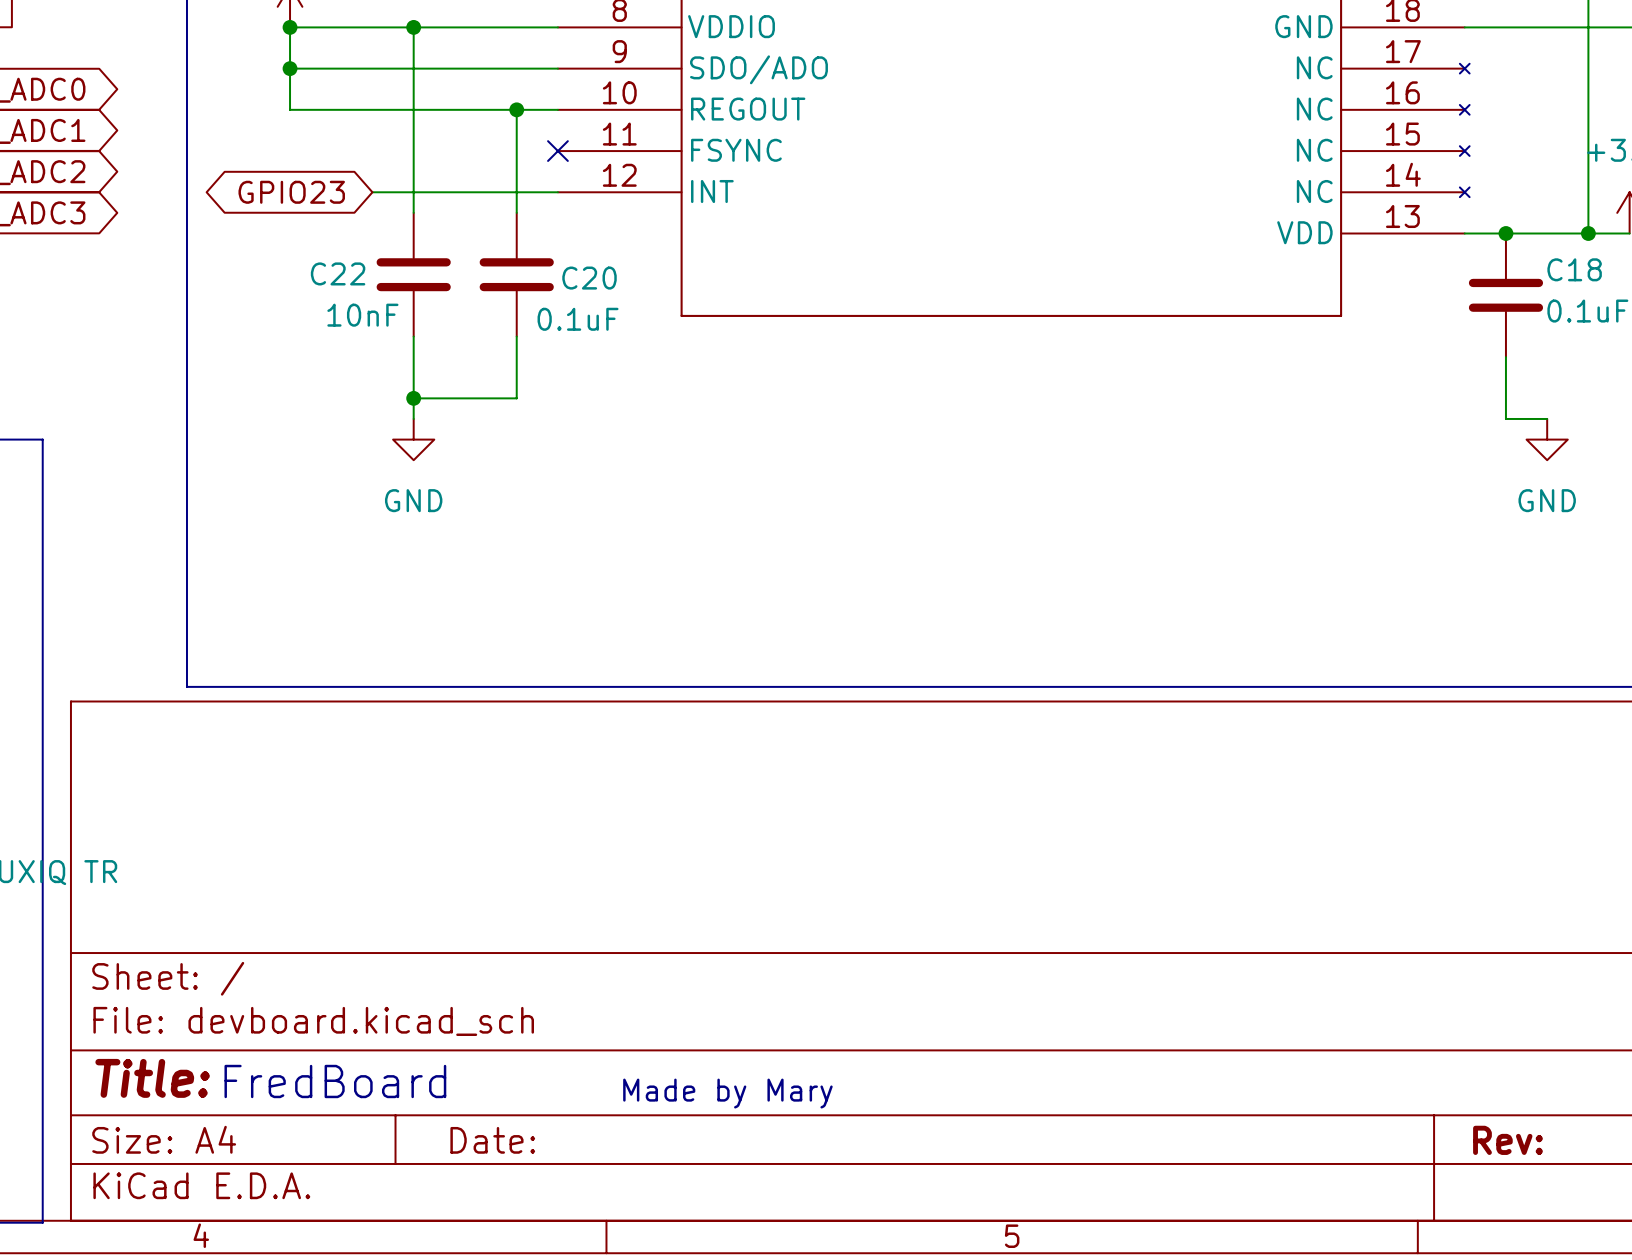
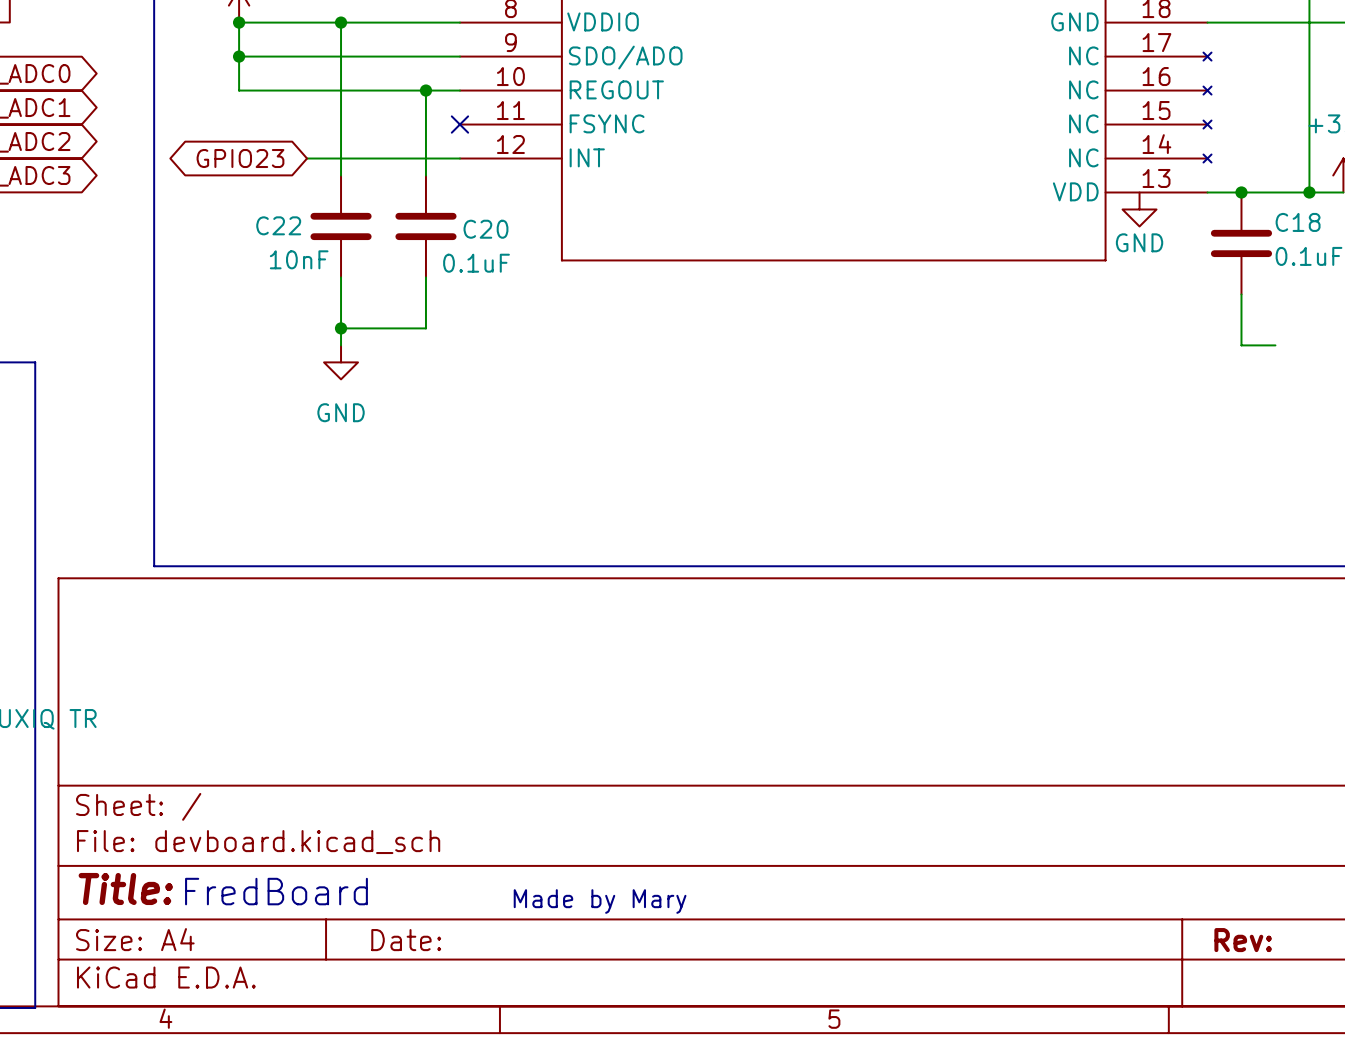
power symbol: none -> GND (1139, 209)
power symbol: GND (1547, 439) -> none

